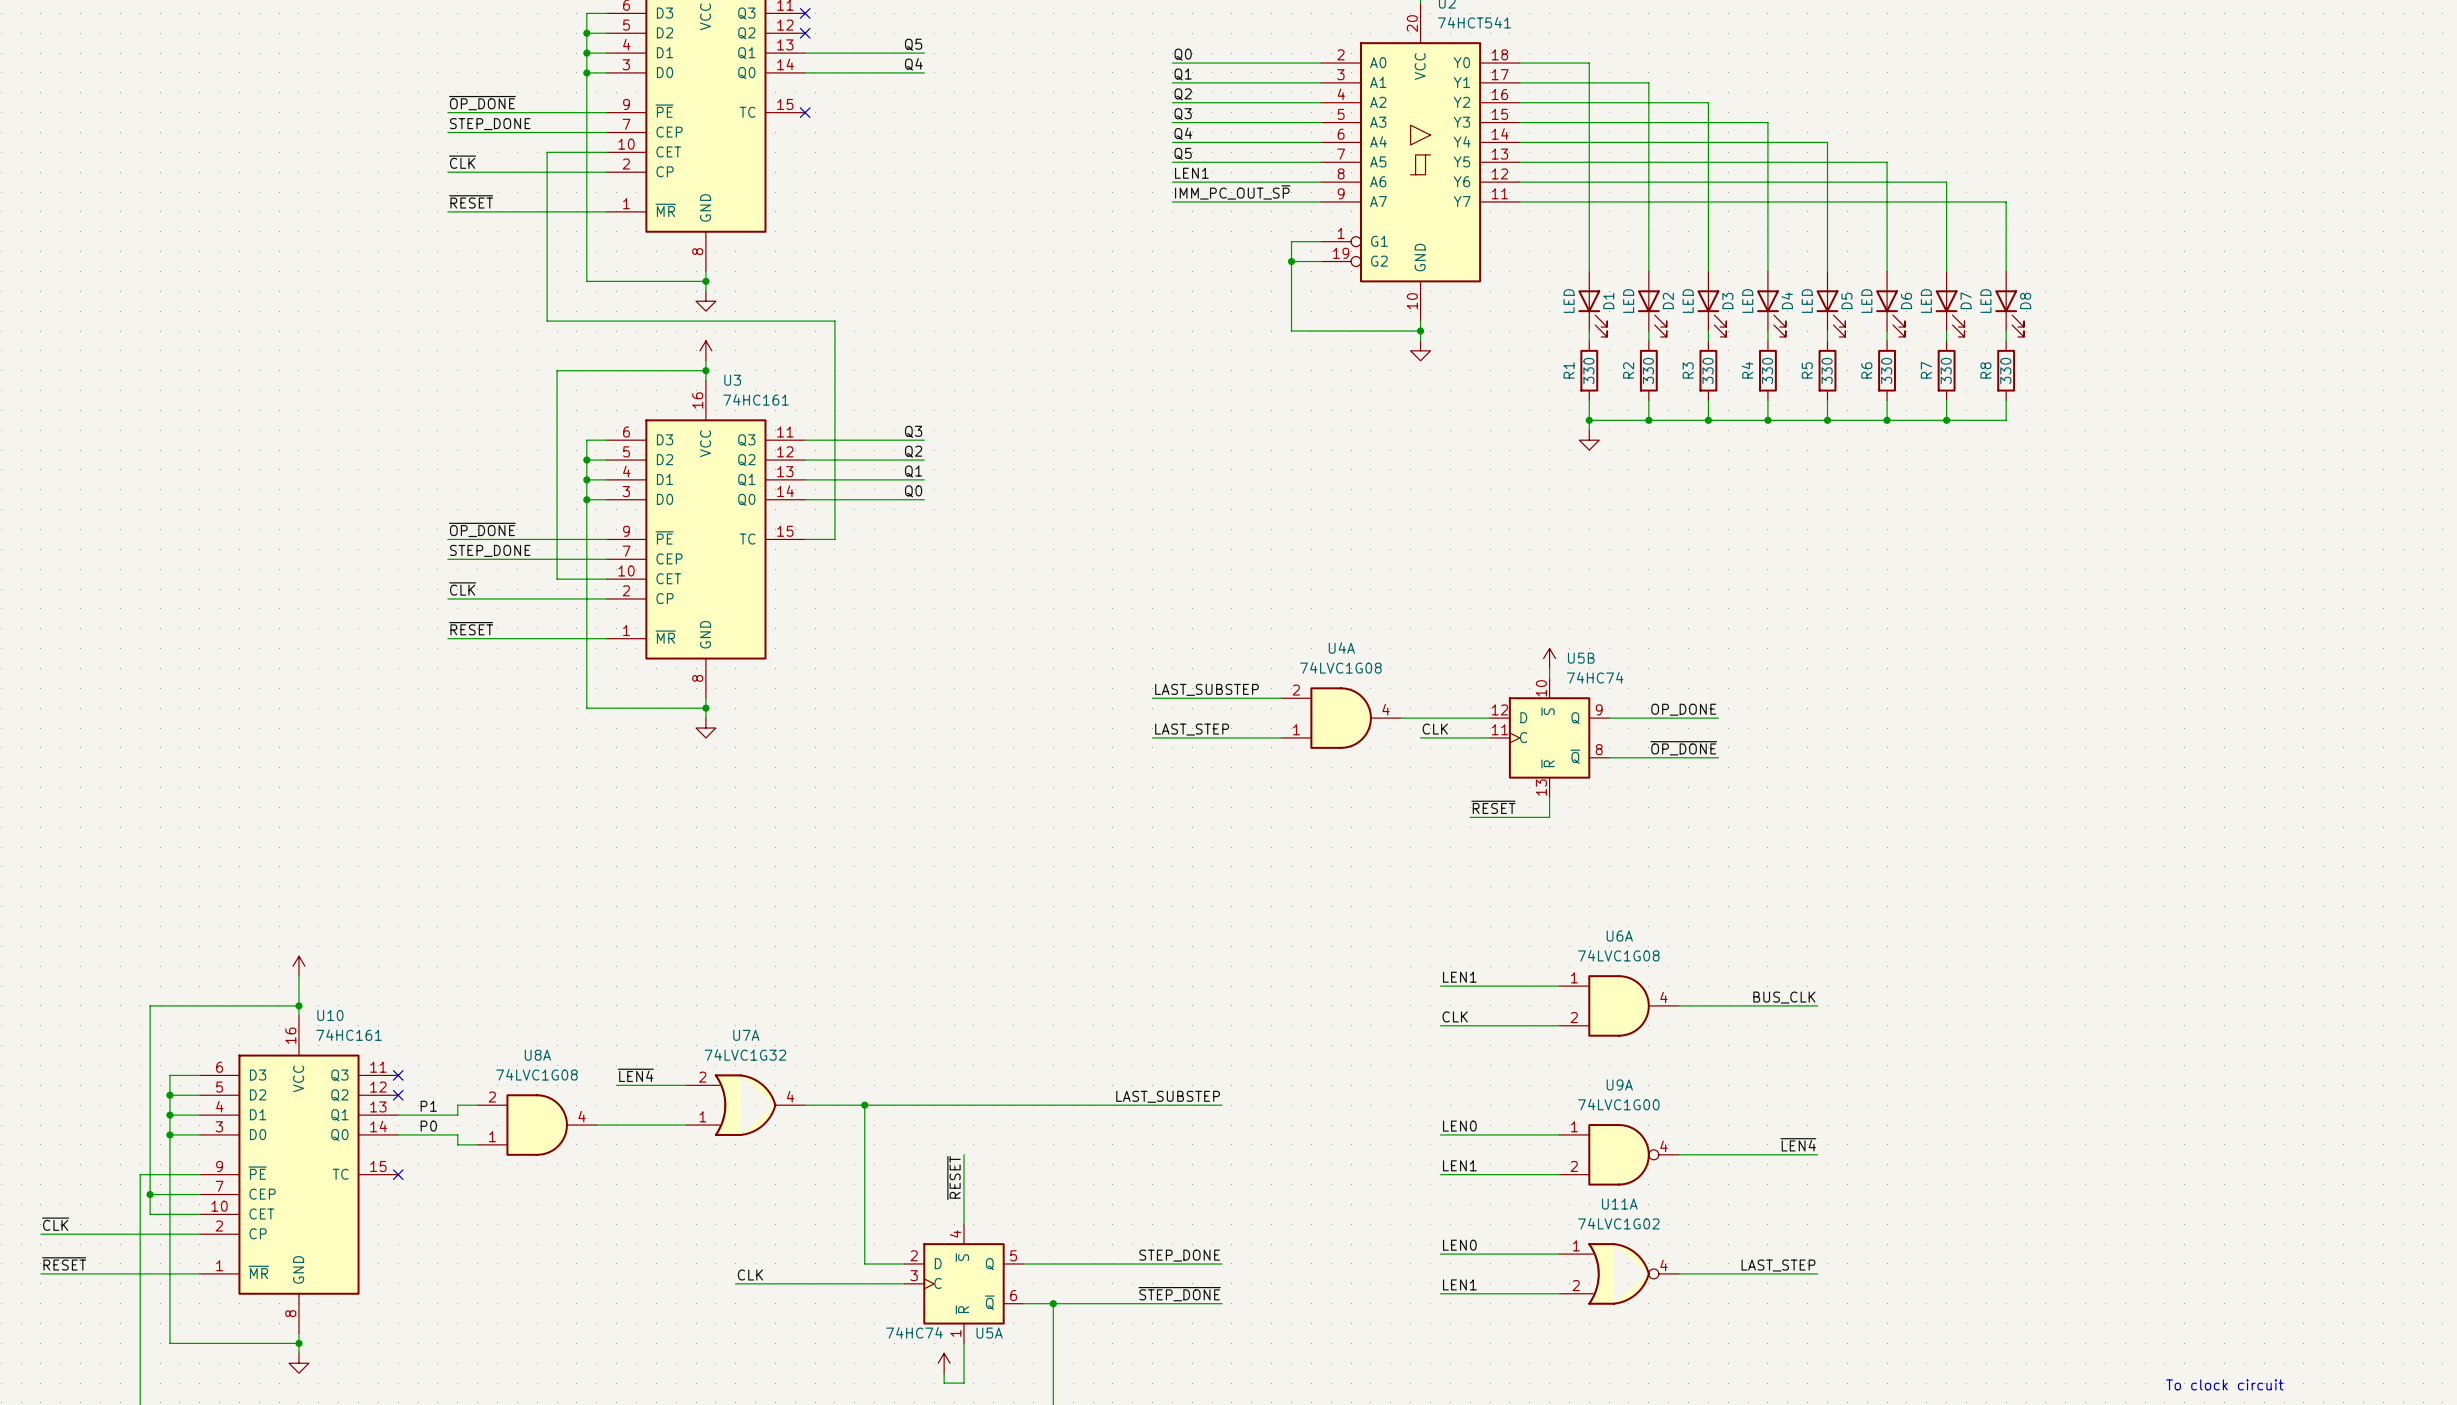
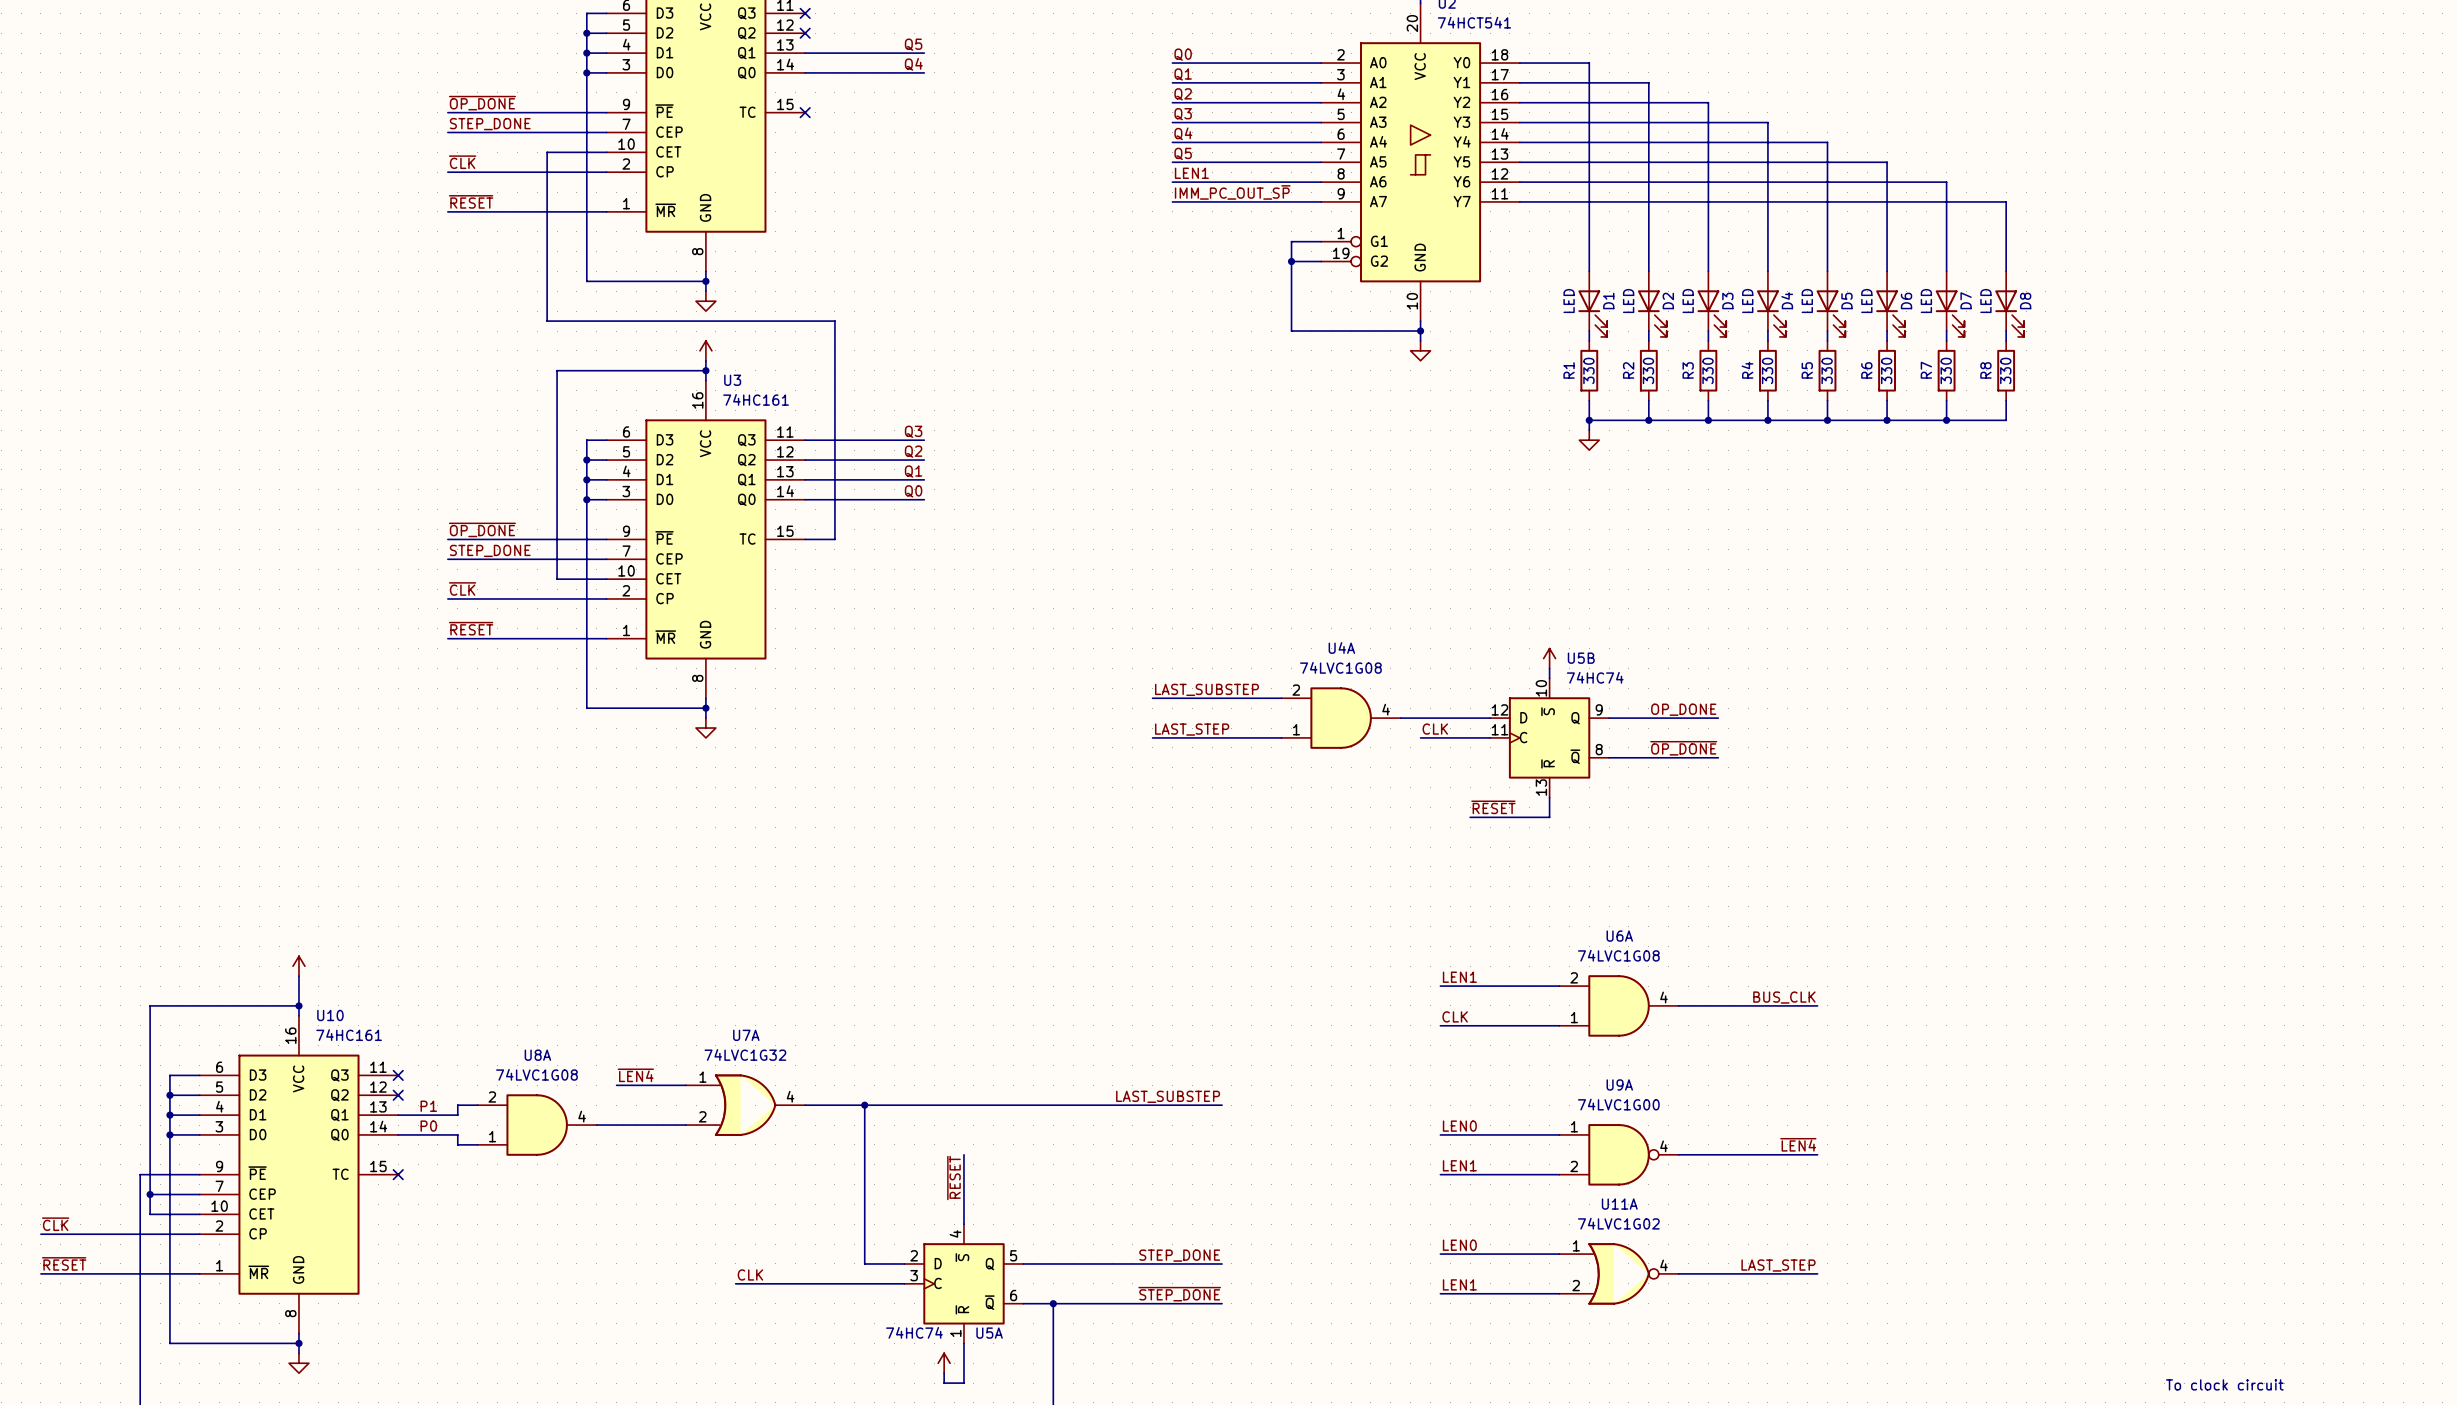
U6A flip: as is (1619, 1005) -> up-down (1619, 1005)
U7A flip: as is (745, 1105) -> up-down (745, 1105)

